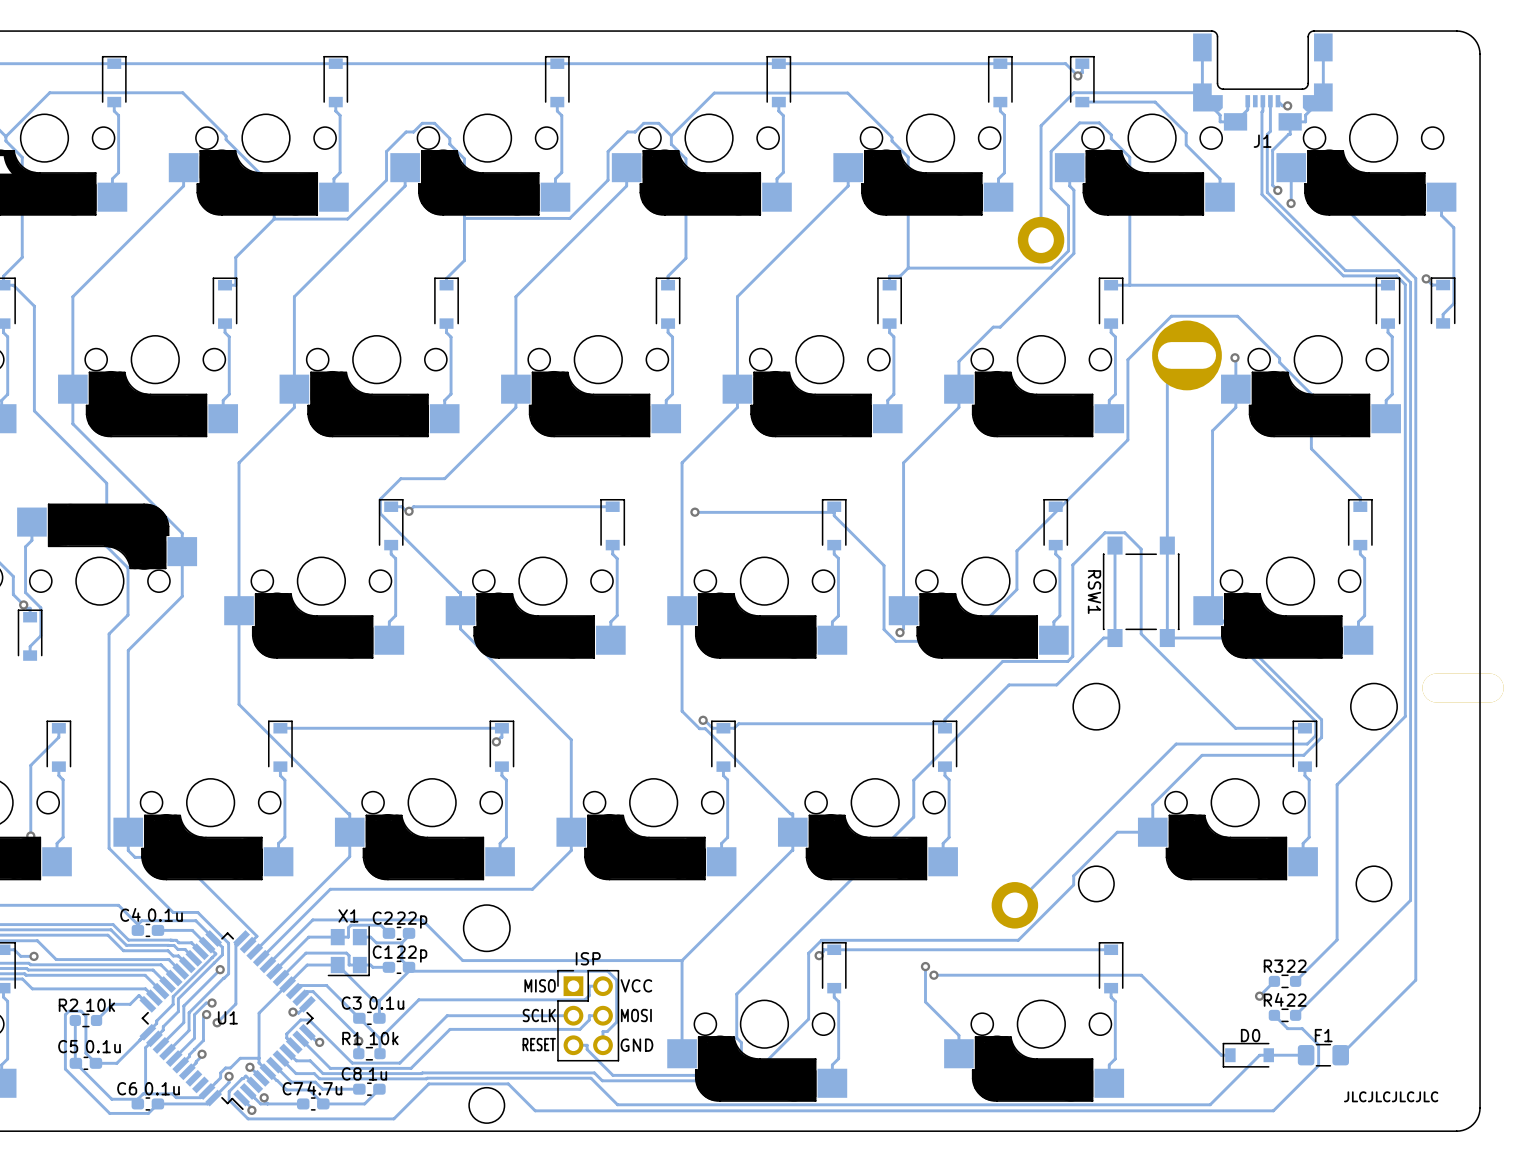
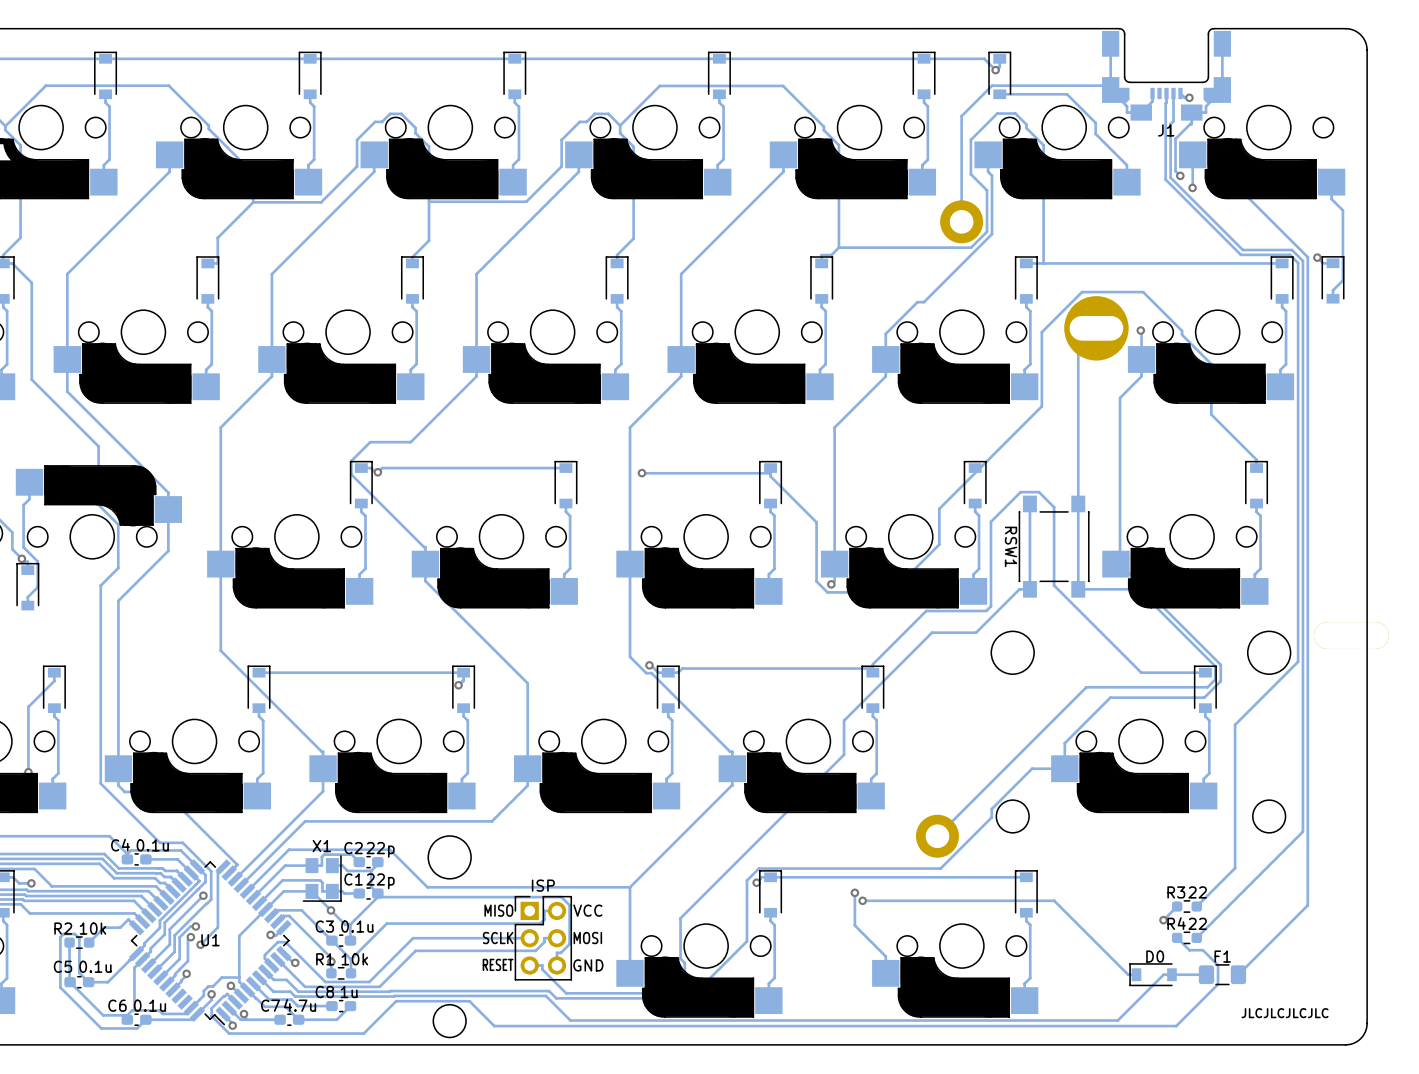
via: none -> (330, 910)

